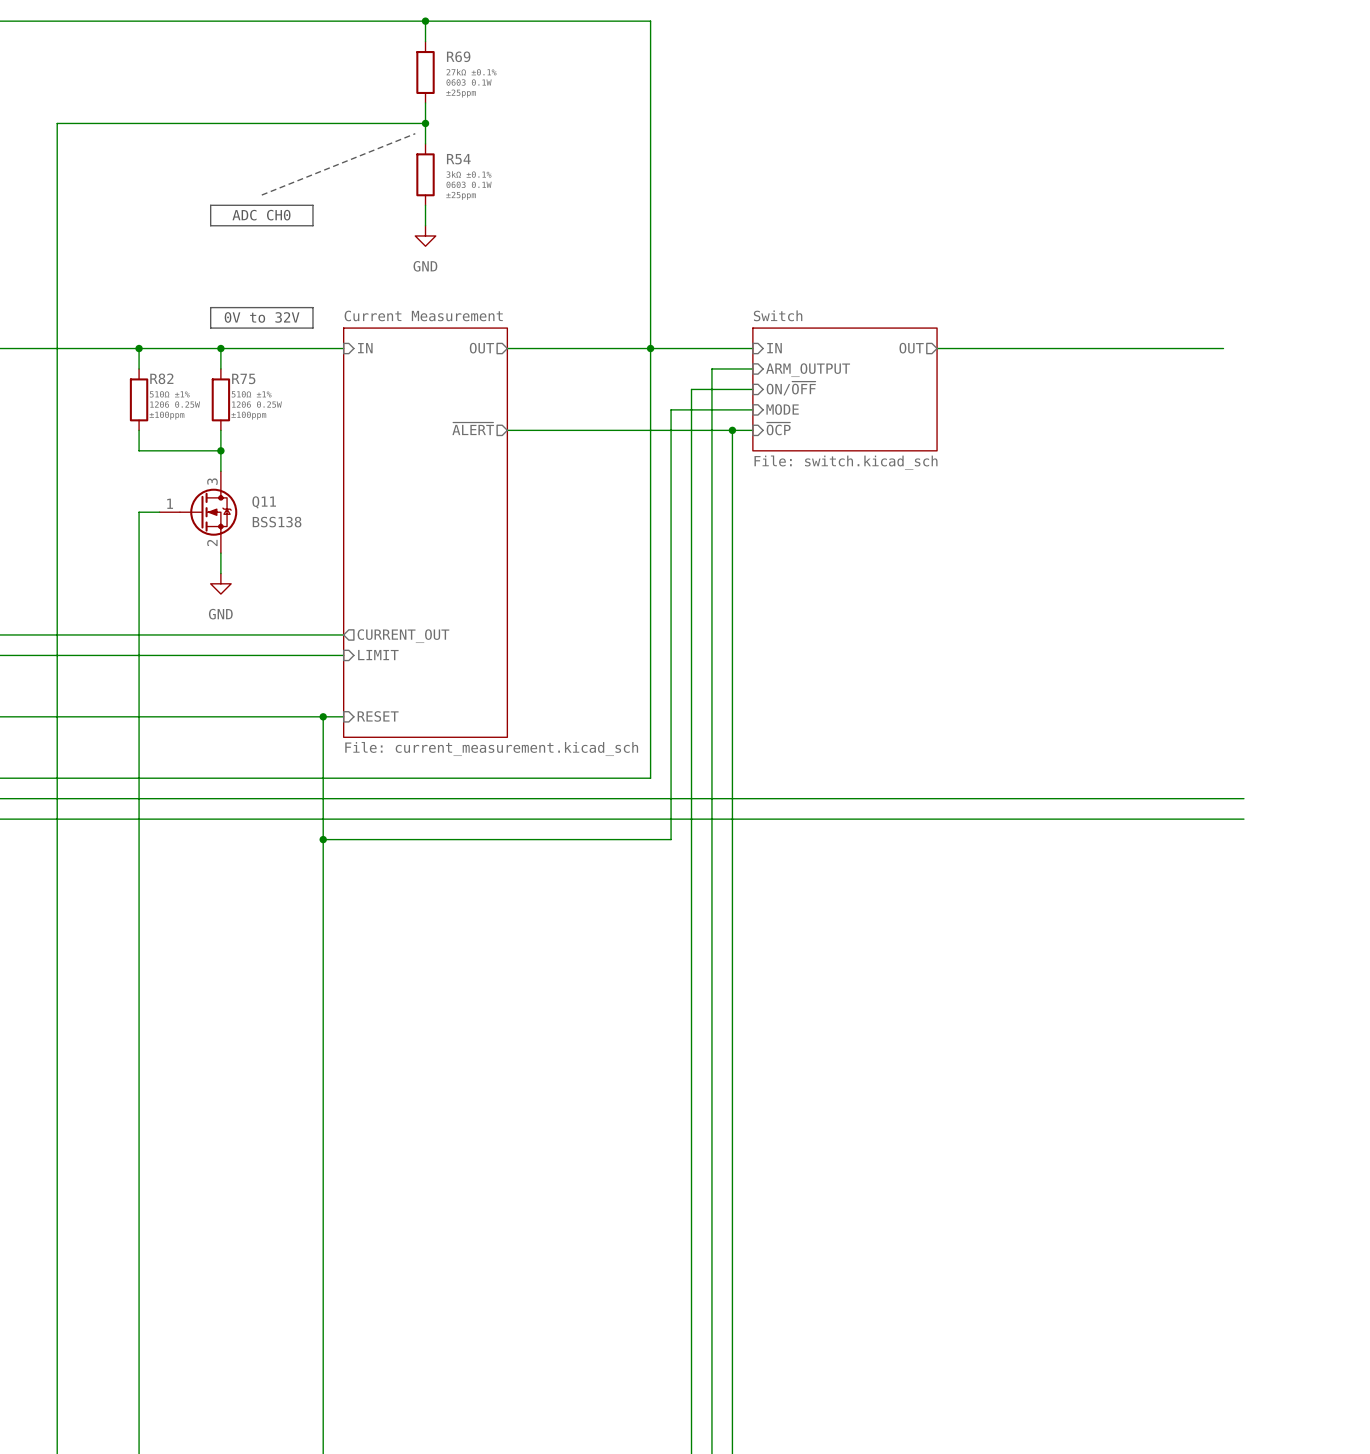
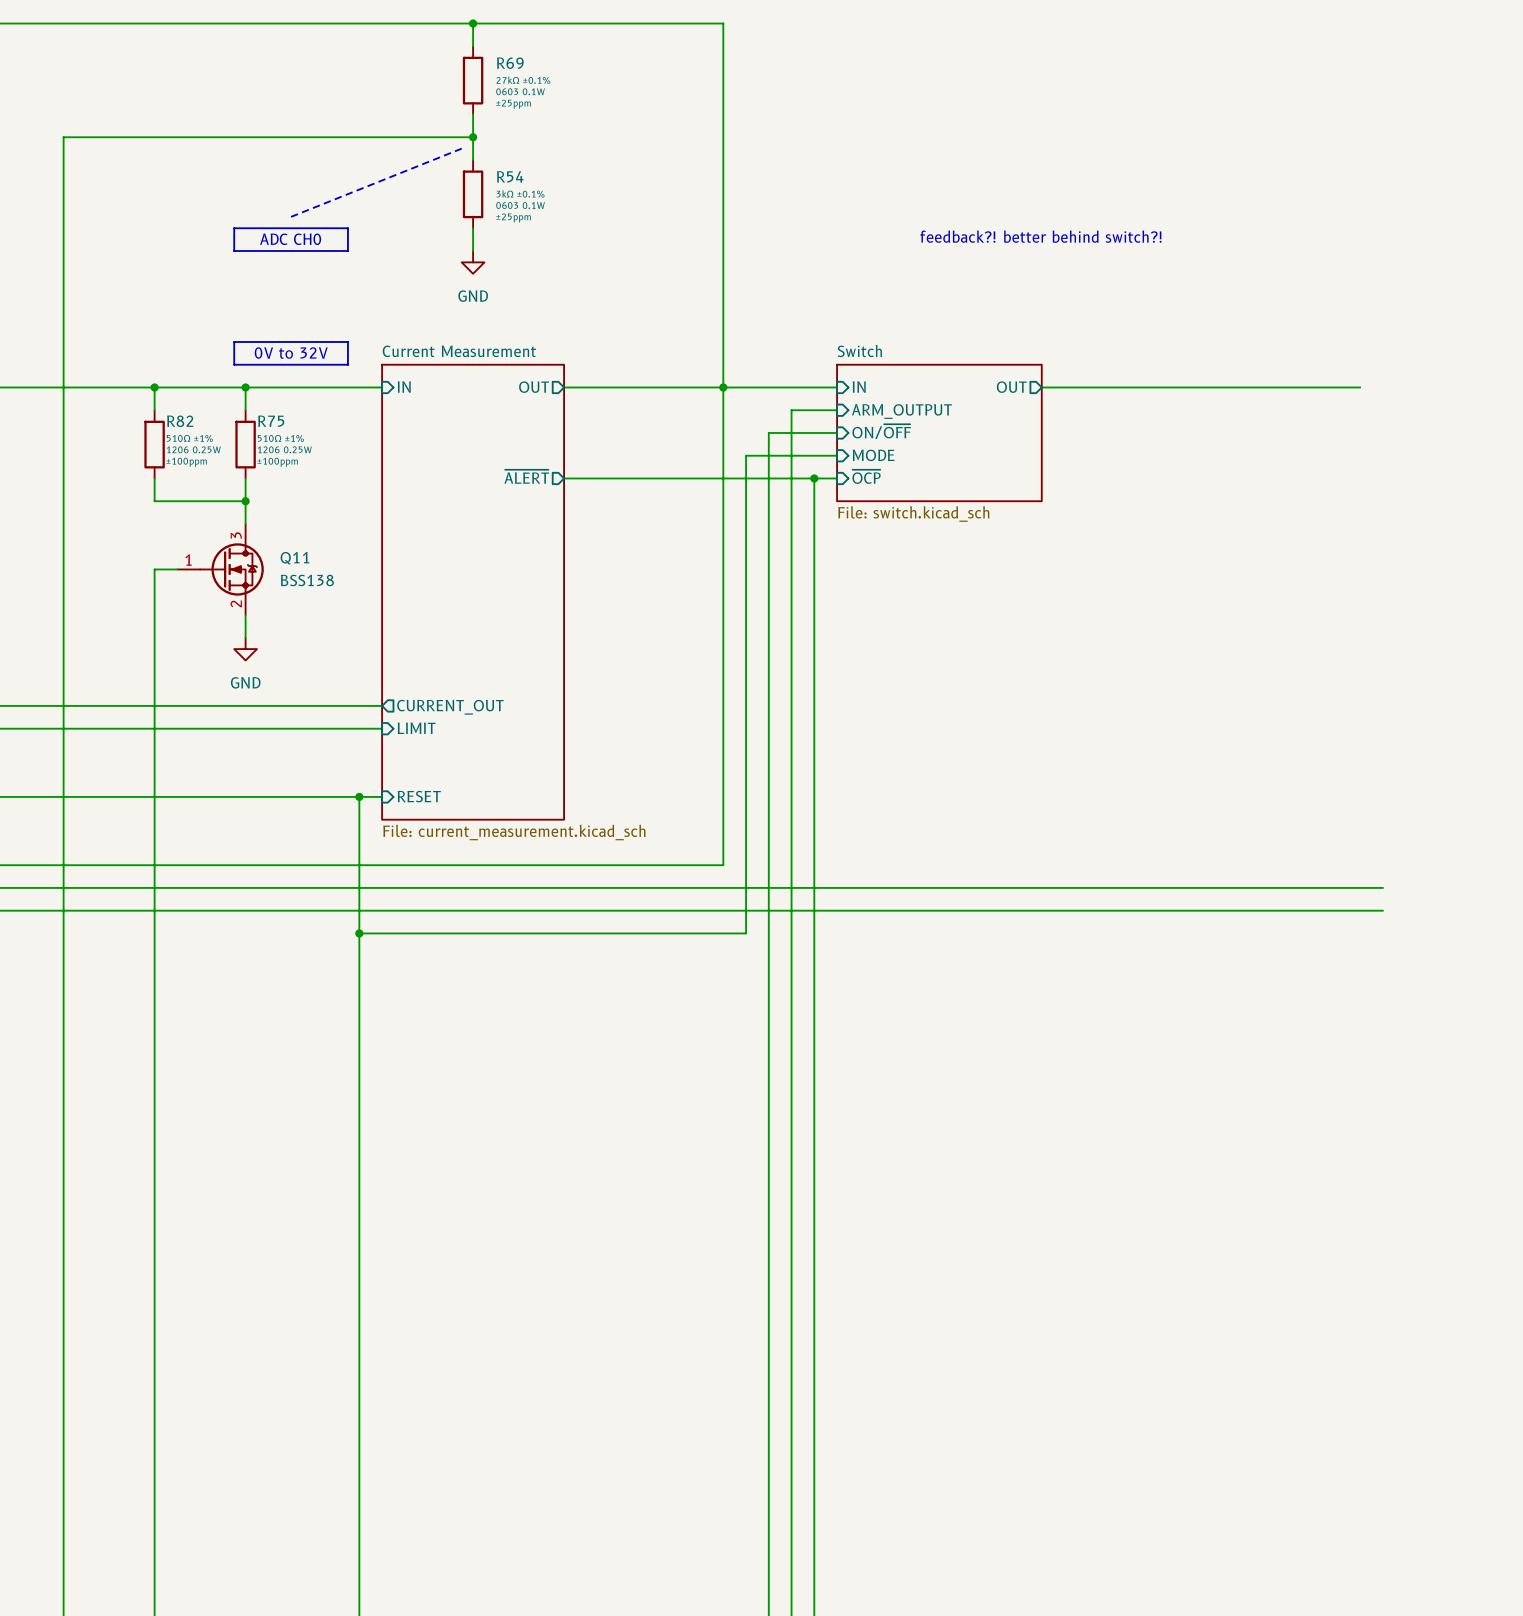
text: none -> feedback?! better behind switch?! (1040, 236)

